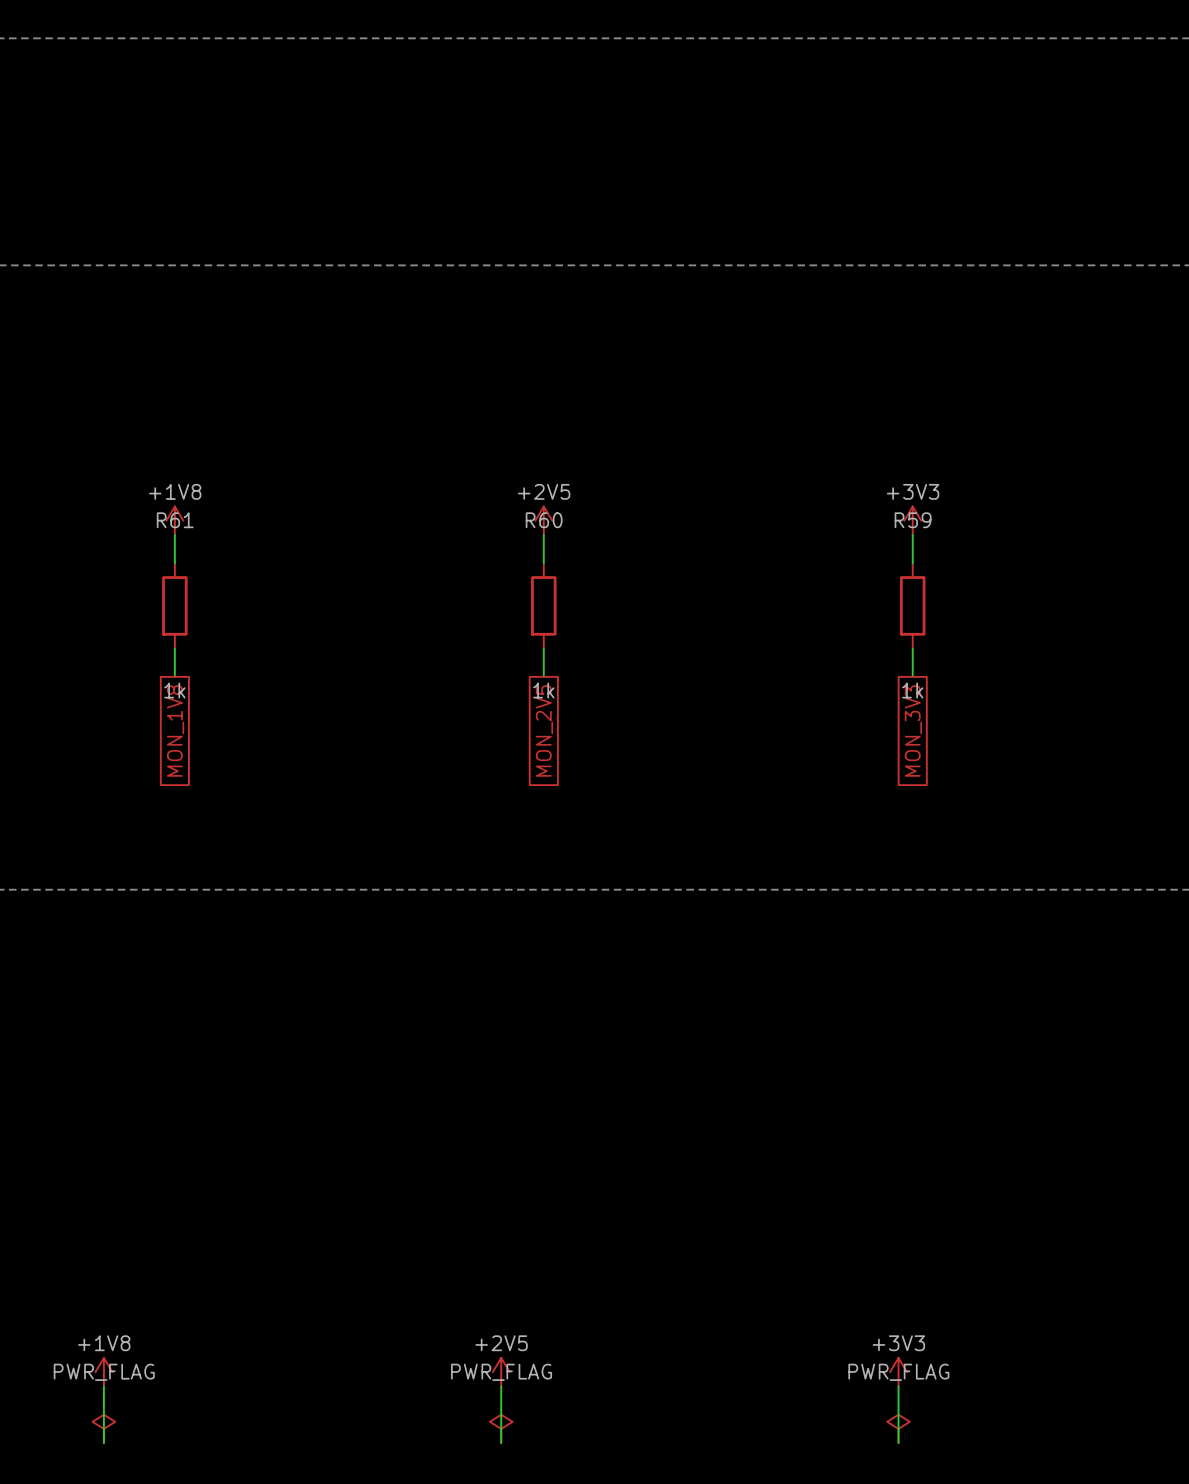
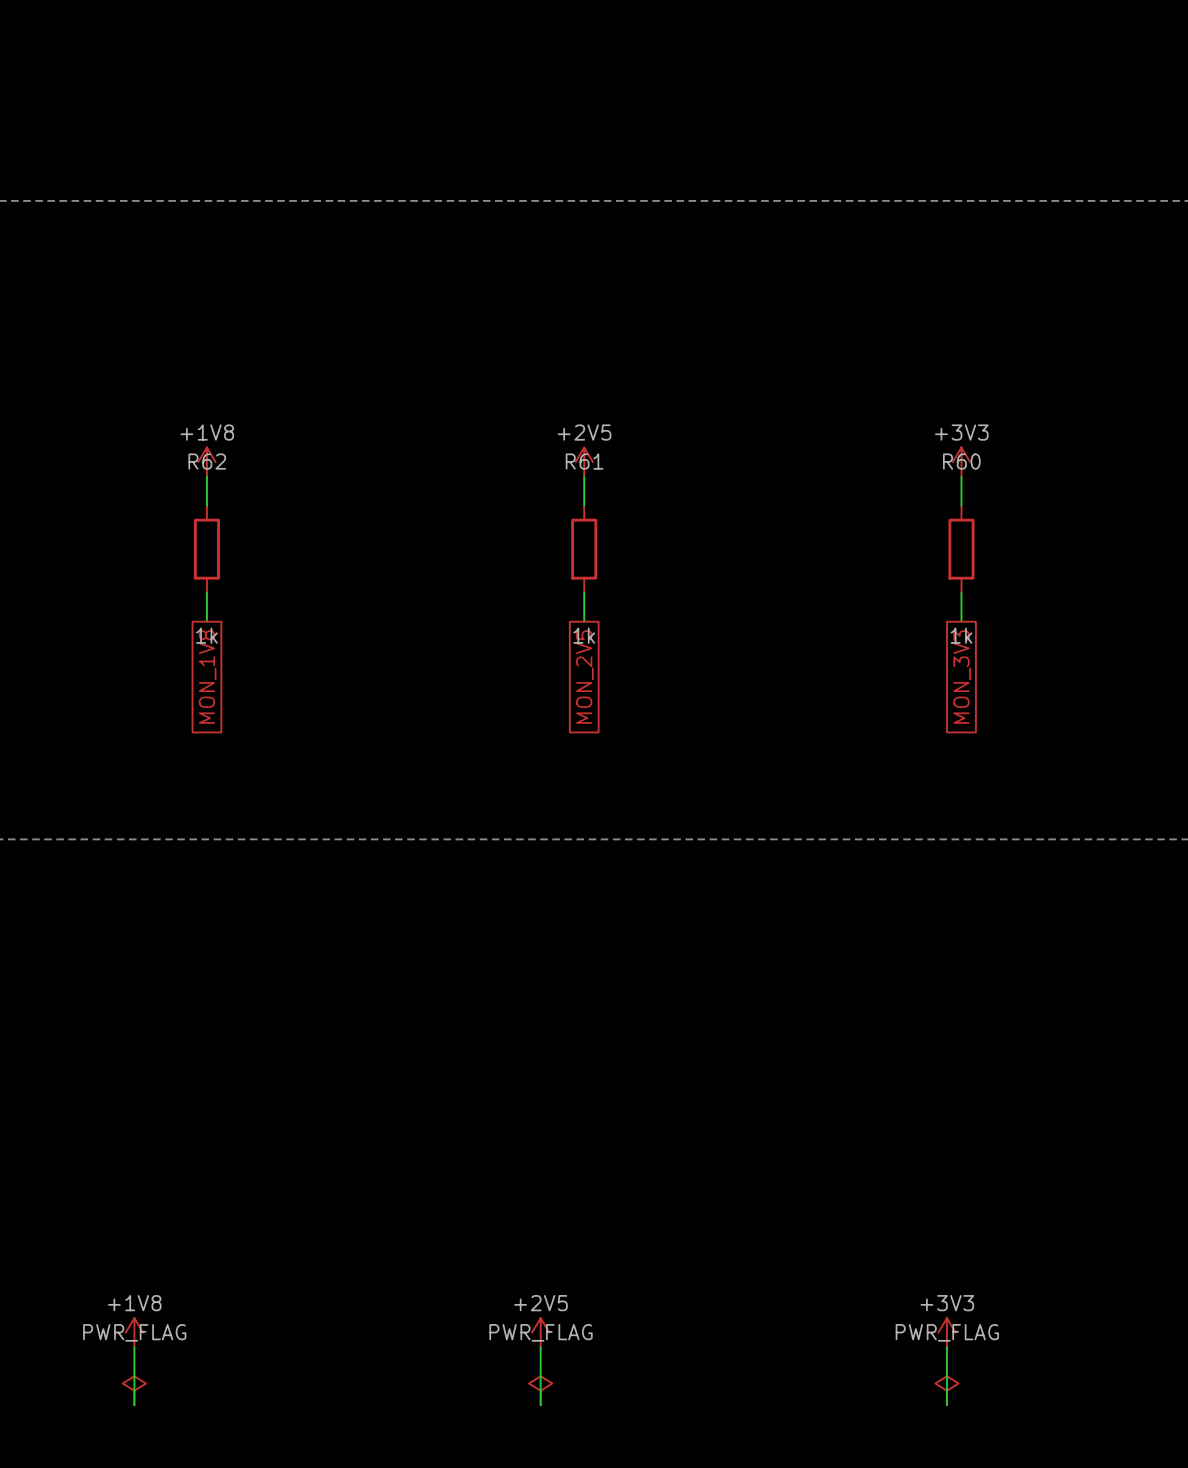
R61 name: R61 (175, 520) -> R62 (207, 461)
R60 name: R60 (544, 520) -> R61 (584, 461)
R59 name: R59 (913, 520) -> R60 (961, 461)

